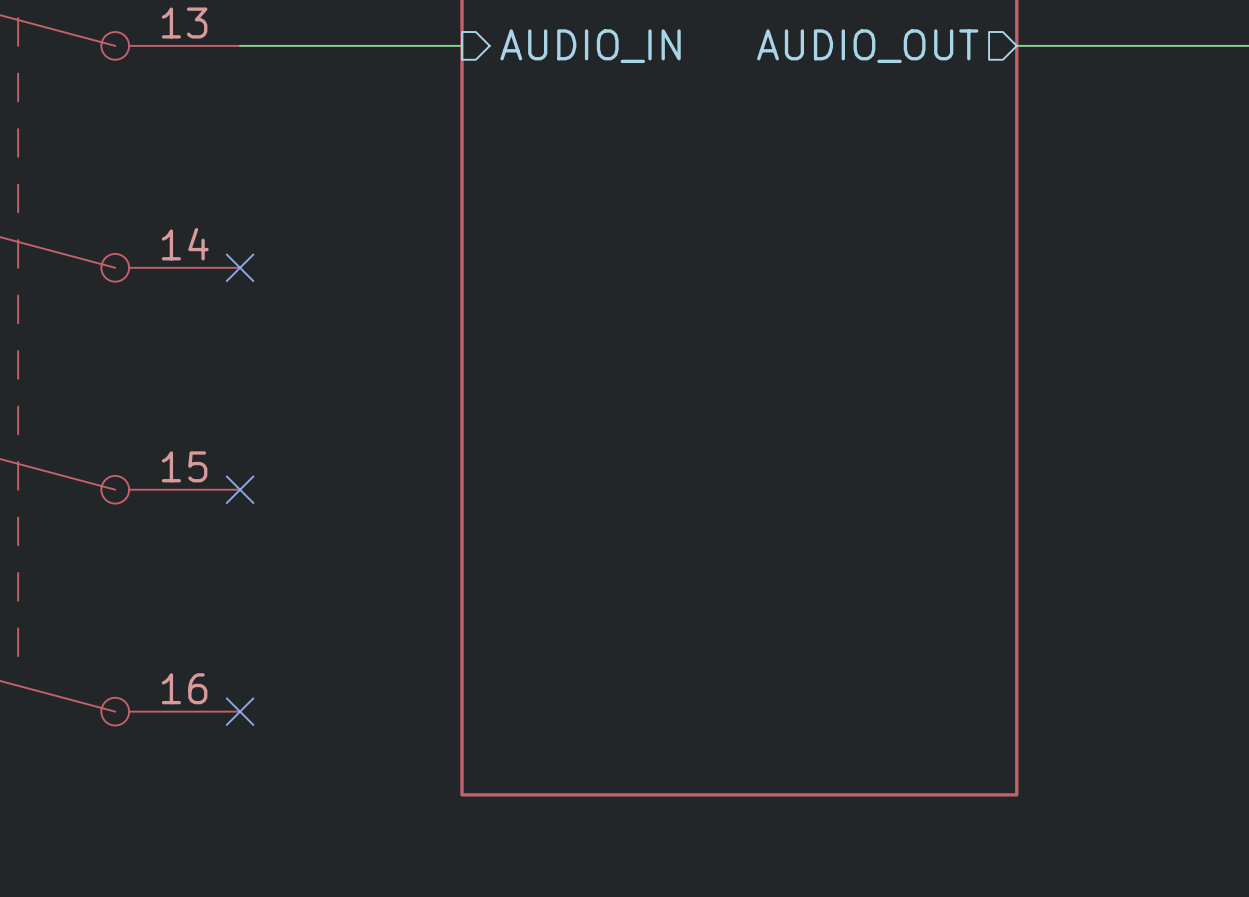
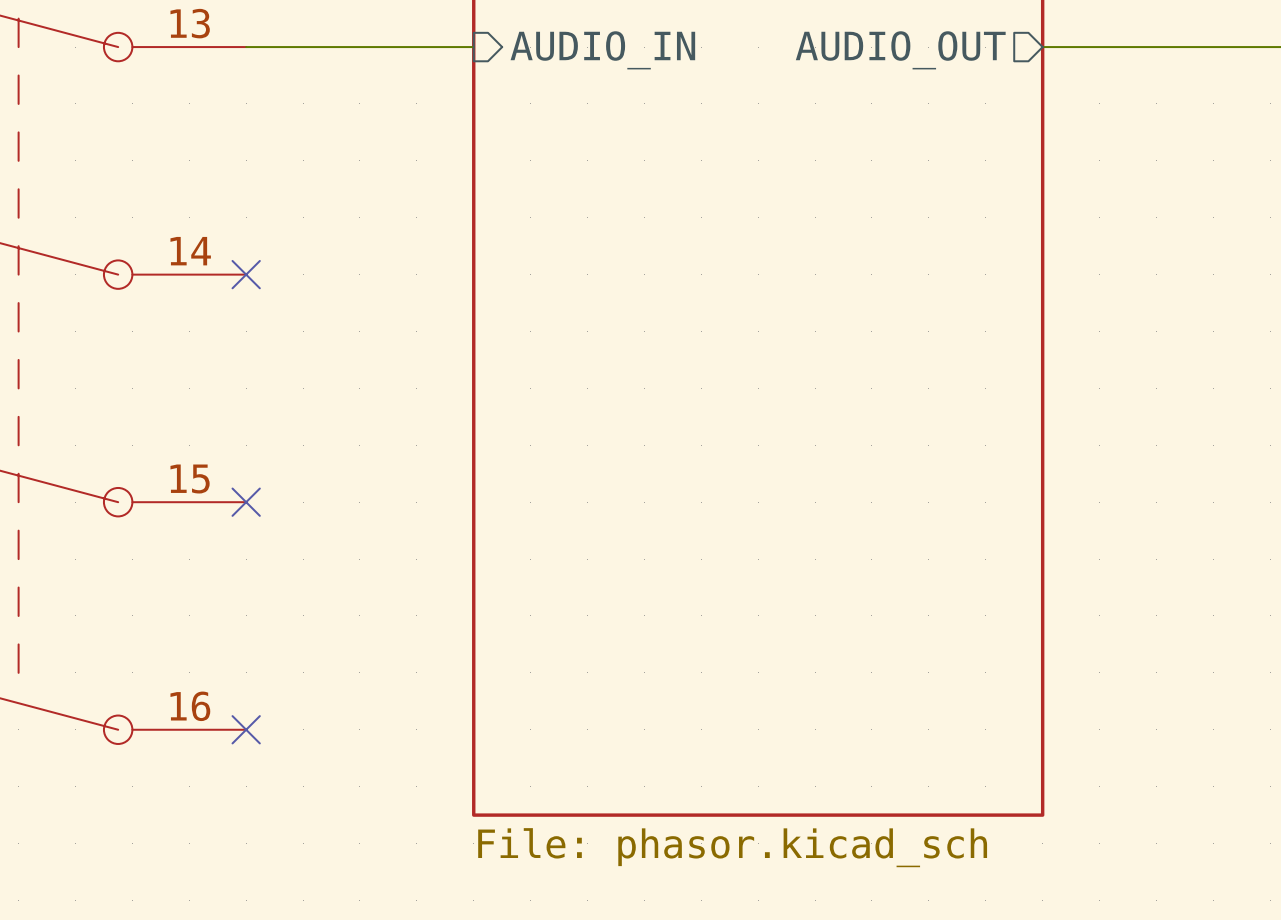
sheet value: none -> File: phasor.kicad_sch (732, 847)

